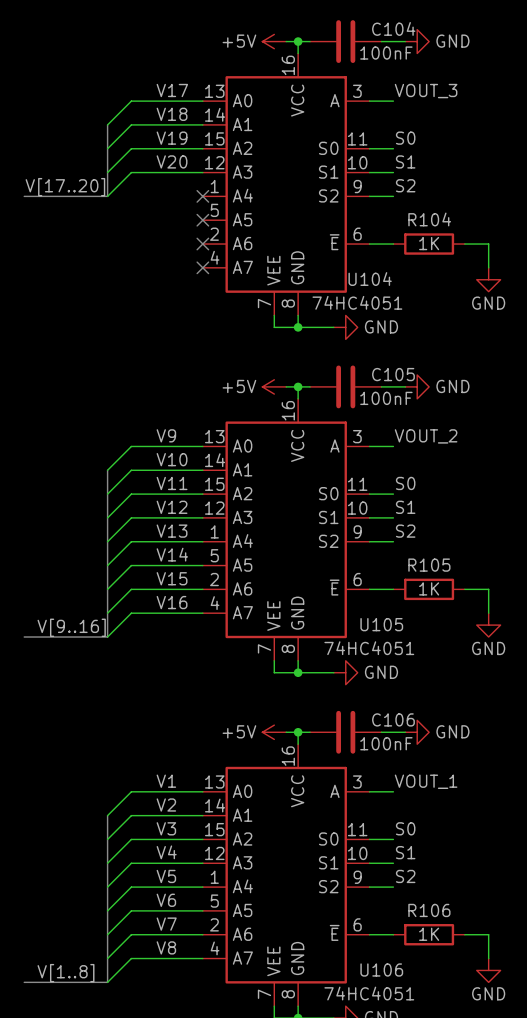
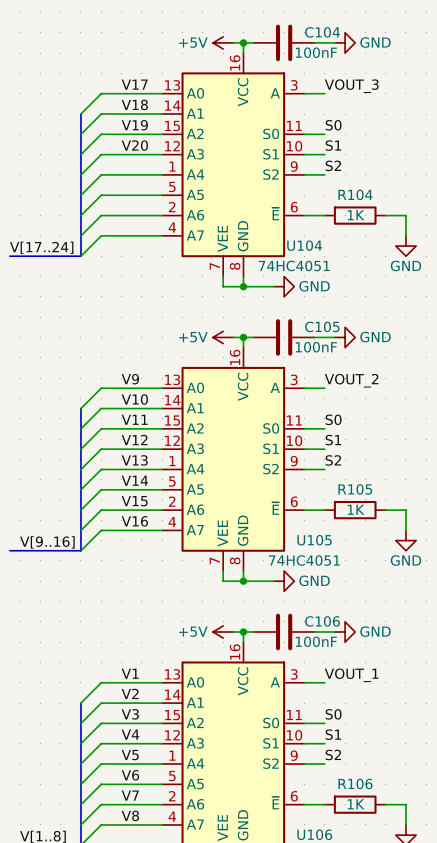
label: V[17..20] (65, 187) -> none
bus: (24, 196) (107, 196) -> (9, 256) (80, 256) (80, 174)
wire: none -> (162, 174) (101, 174) (80, 195)
no-connect mark: (202, 196) -> none
wire: none -> (162, 195) (101, 195) (80, 215)
no-connect mark: (202, 220) -> none
wire: none -> (162, 215) (101, 215) (80, 235)
no-connect mark: (202, 244) -> none
wire: none -> (162, 235) (101, 235) (80, 256)
no-connect mark: (202, 267) -> none
label: none -> V[17..24] (41, 247)

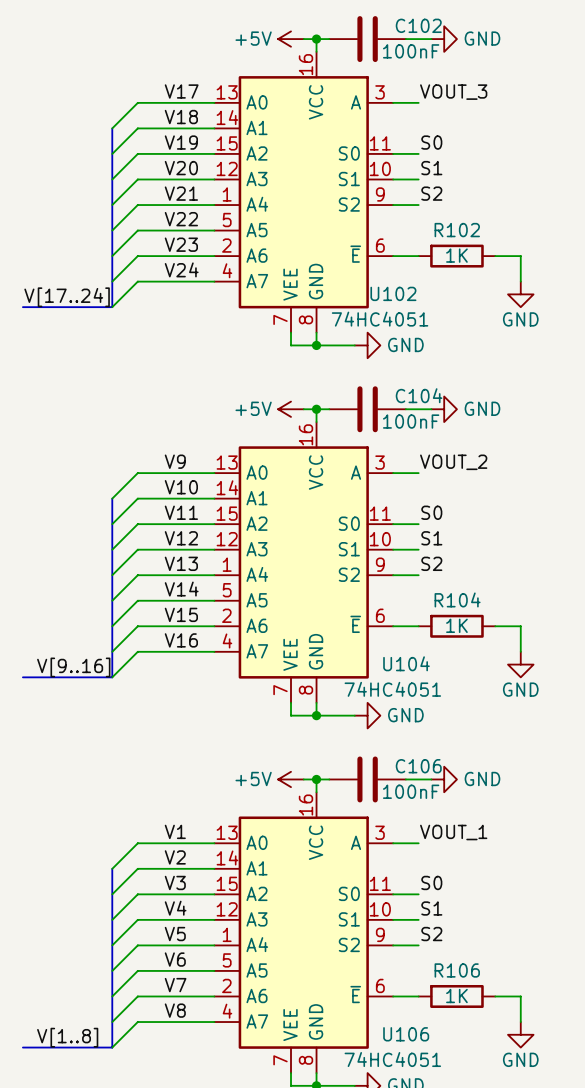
C104 name: C104 (322, 32) -> C102 (418, 25)
label: none -> V21 (181, 193)
label: none -> V22 (181, 219)
R104 name: R104 (355, 194) -> R102 (457, 230)
label: none -> V23 (181, 244)
label: none -> V24 (181, 269)
U104 name: U104 (304, 245) -> U102 (393, 293)
C105 name: C105 (322, 326) -> C104 (419, 395)
R105 name: R105 (355, 489) -> R104 (457, 599)
U105 name: U105 (314, 540) -> U104 (406, 663)

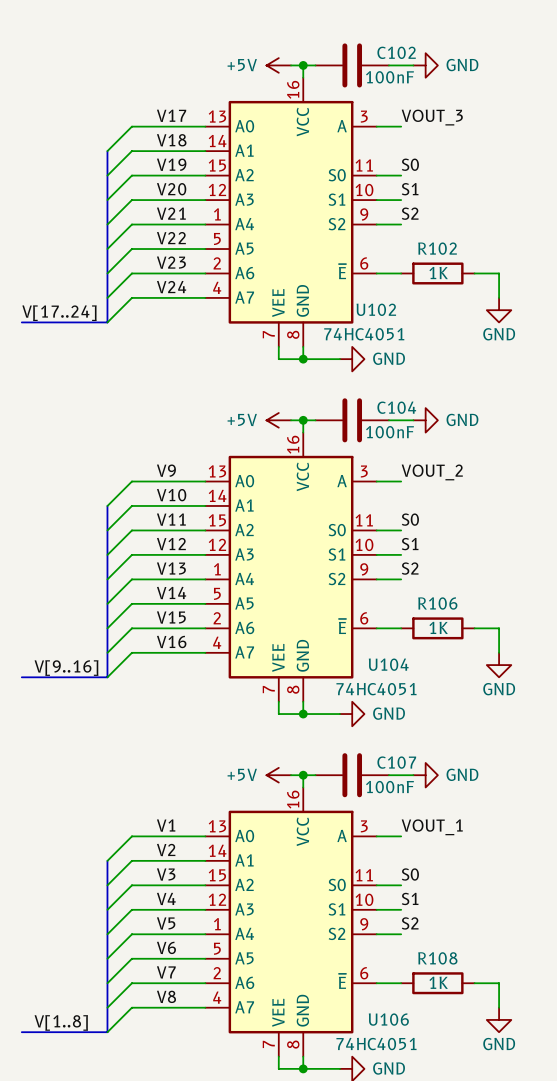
R104 name: R104 (457, 599) -> R106 (437, 603)
C106 name: C106 (418, 766) -> C107 (396, 762)
R106 name: R106 (457, 970) -> R108 (437, 958)

